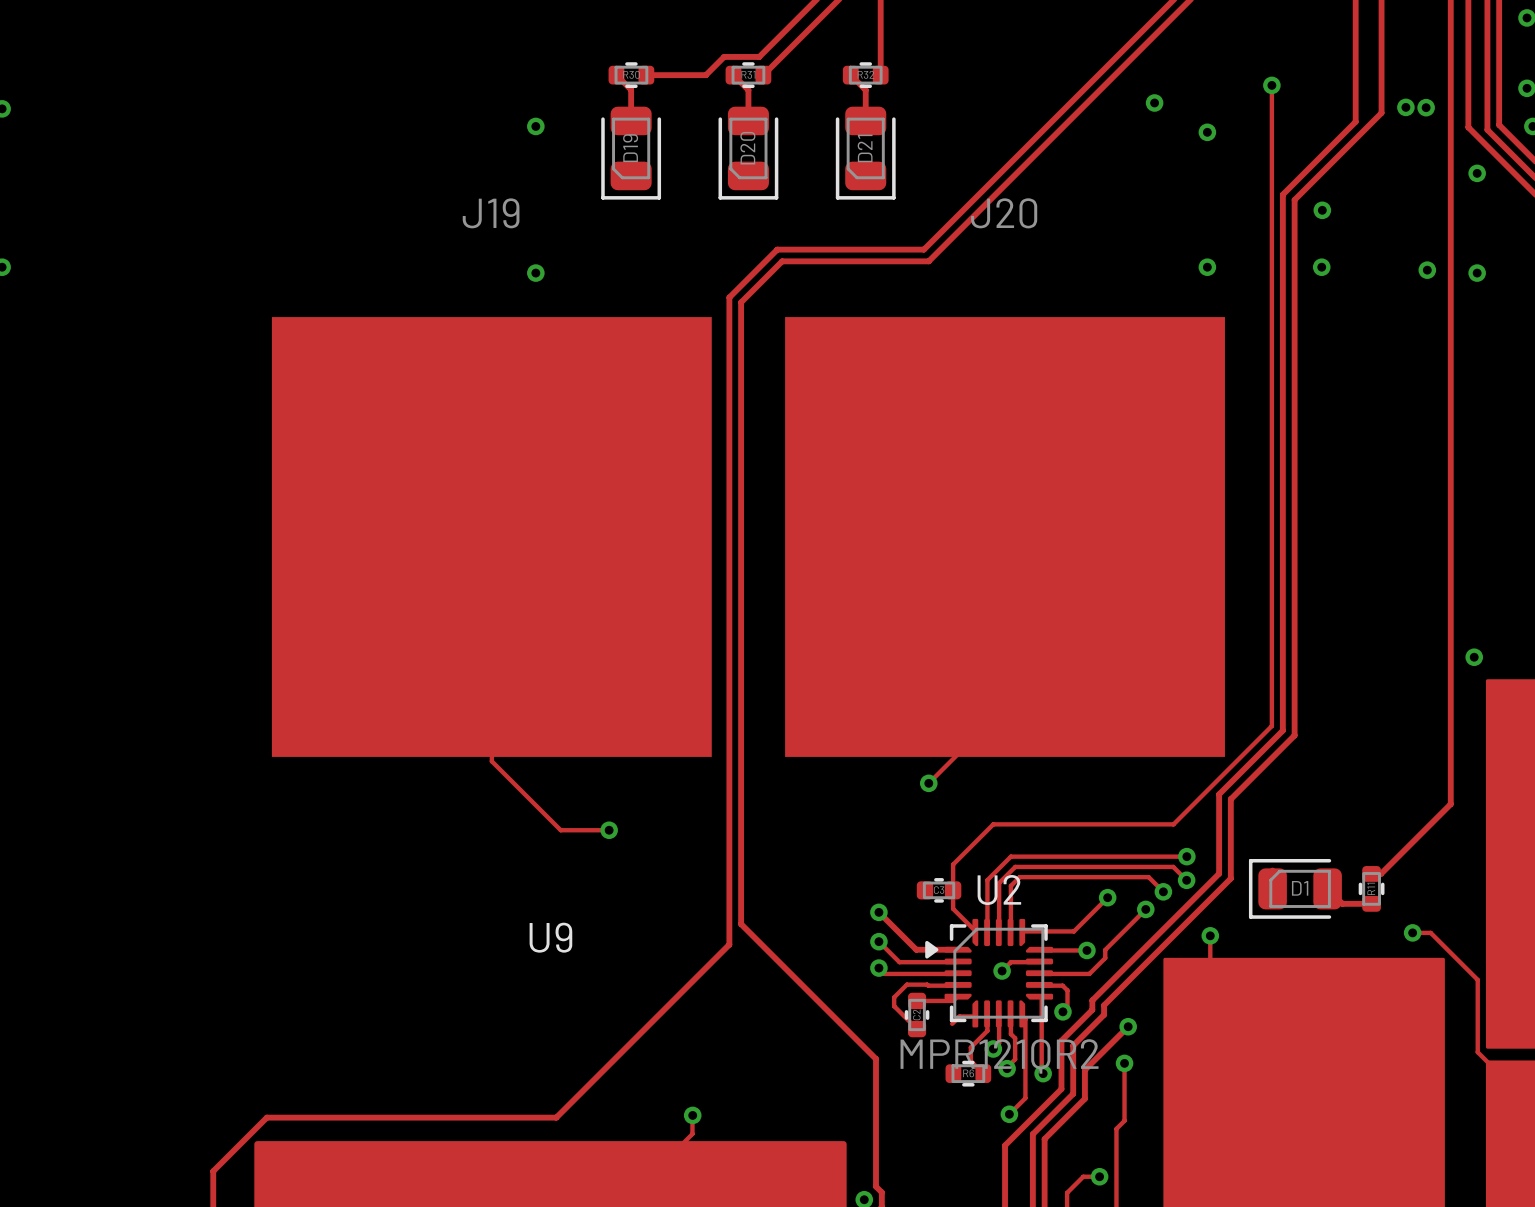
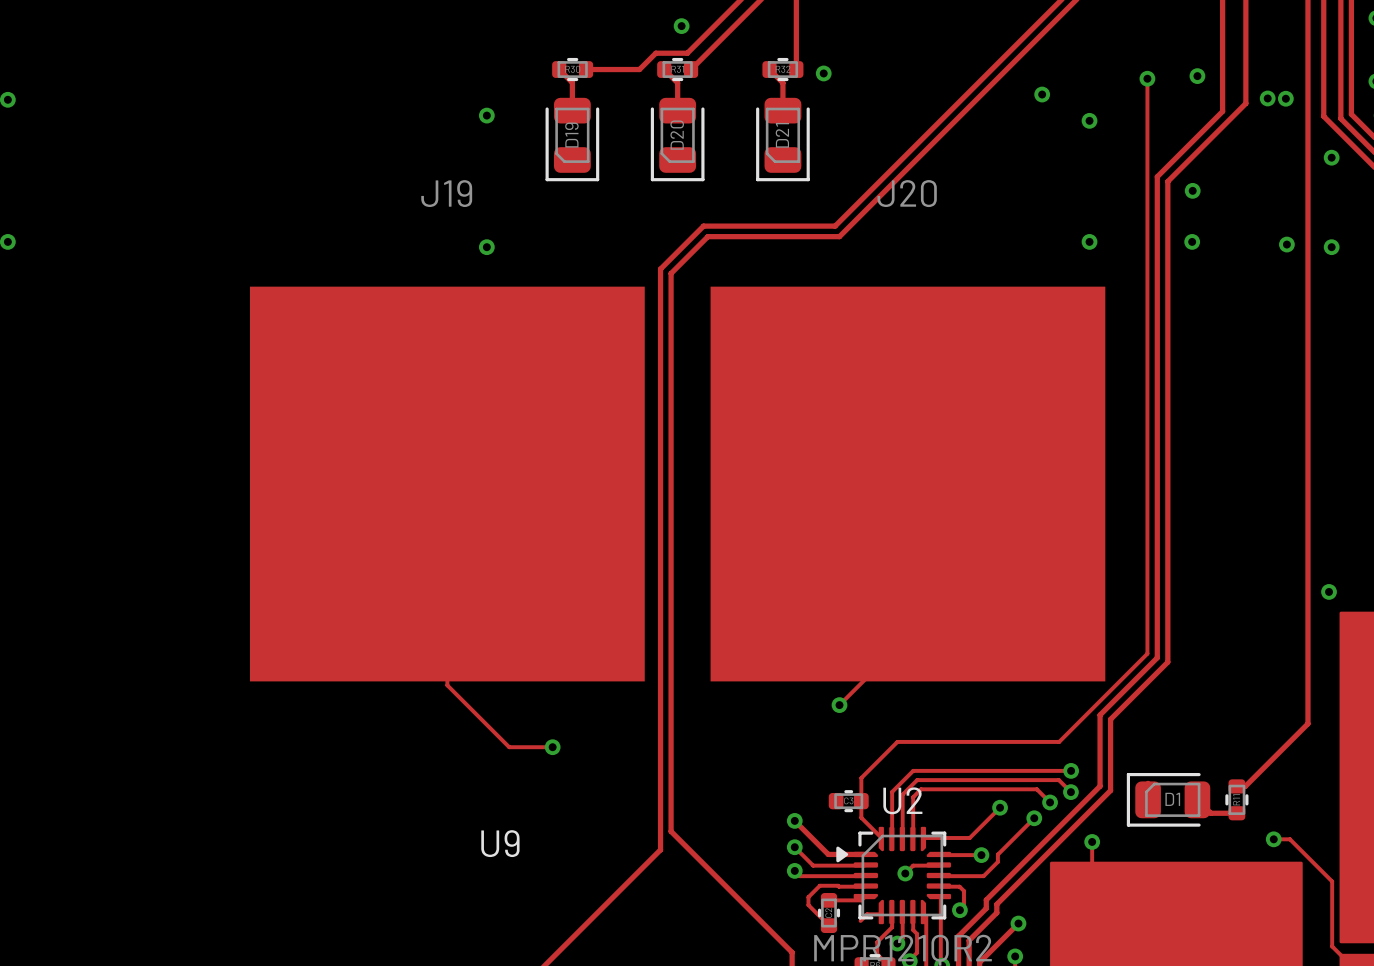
via: none -> (681, 26)
via: none -> (823, 73)
via: none -> (1197, 76)

